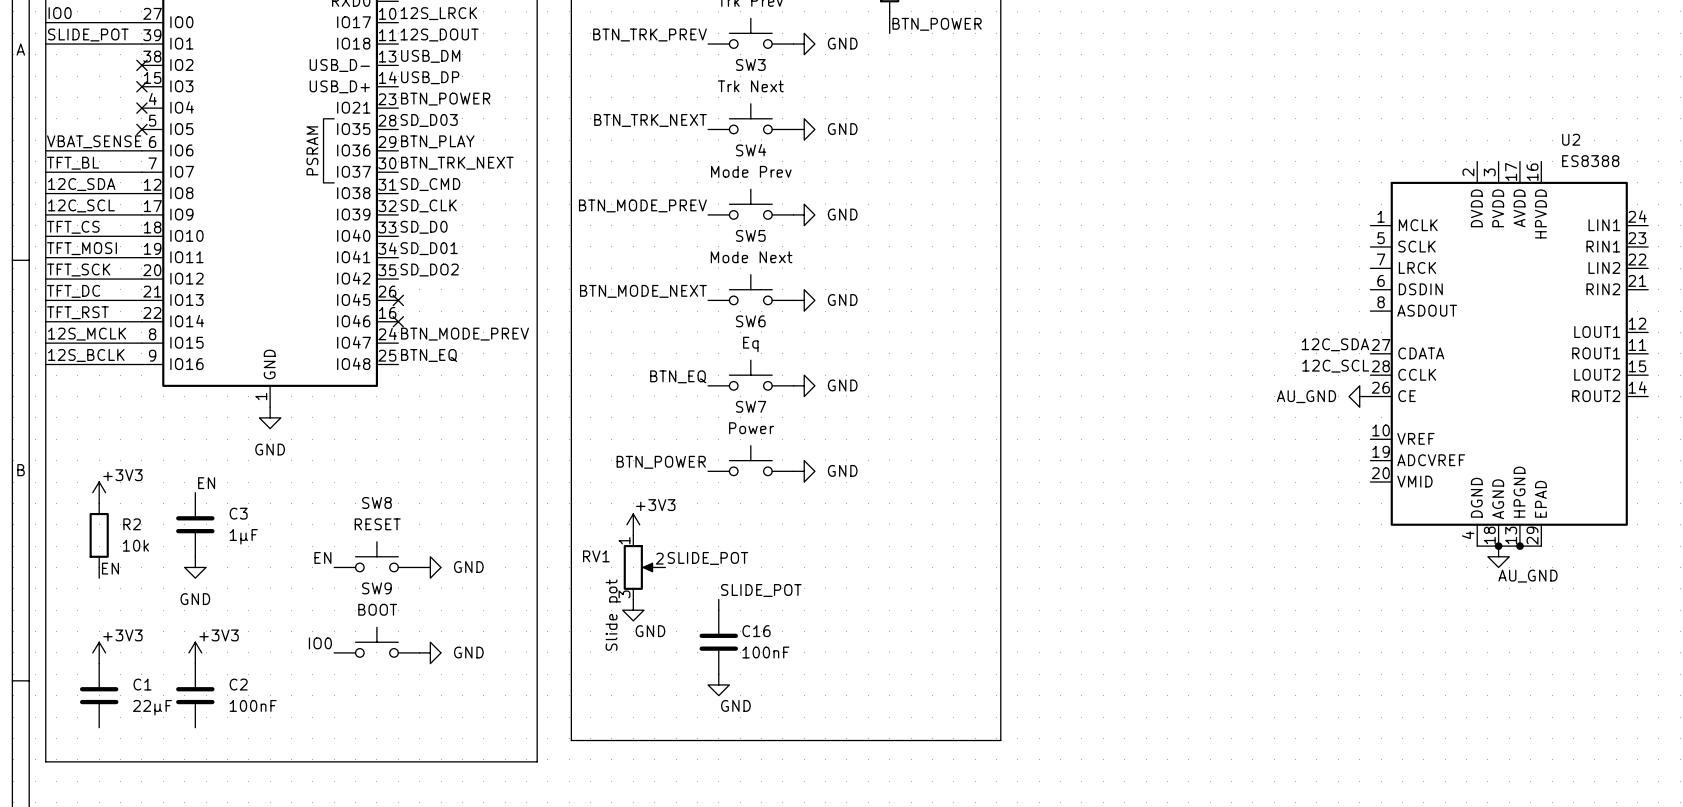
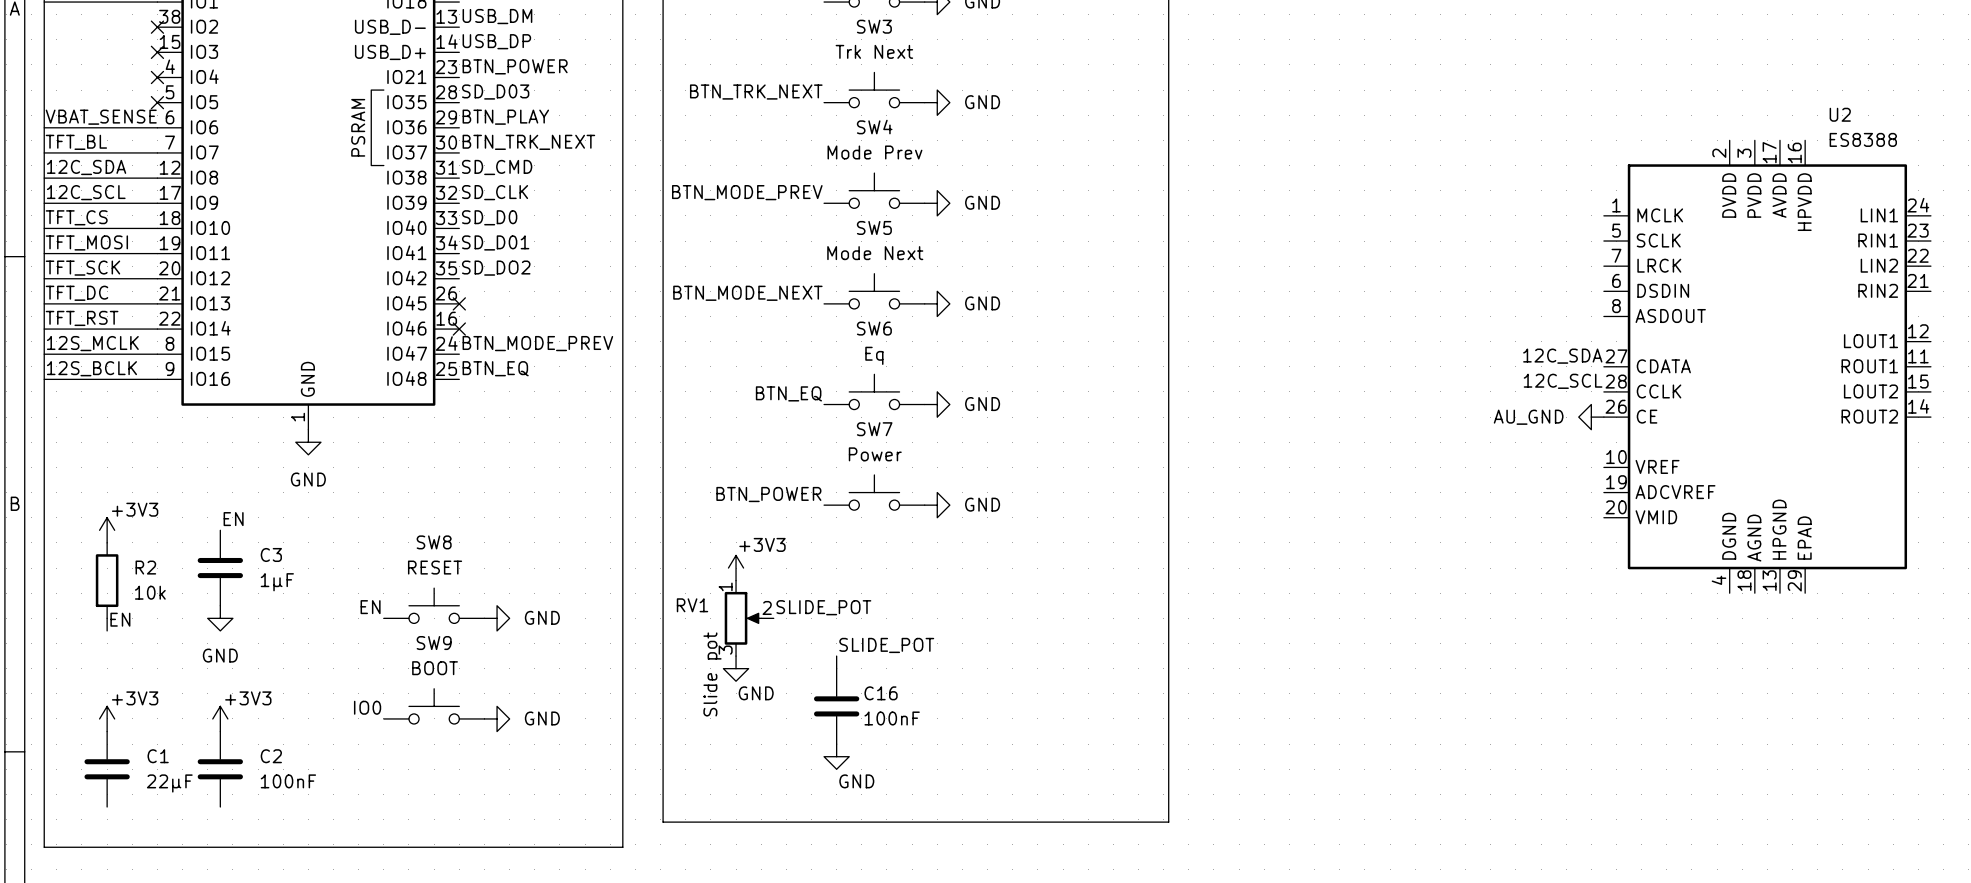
wire: (1477, 546) (1541, 546) -> none
junction: (1498, 546) -> none
junction: (1519, 546) -> none
power symbol: AU_GND (1498, 556) -> none

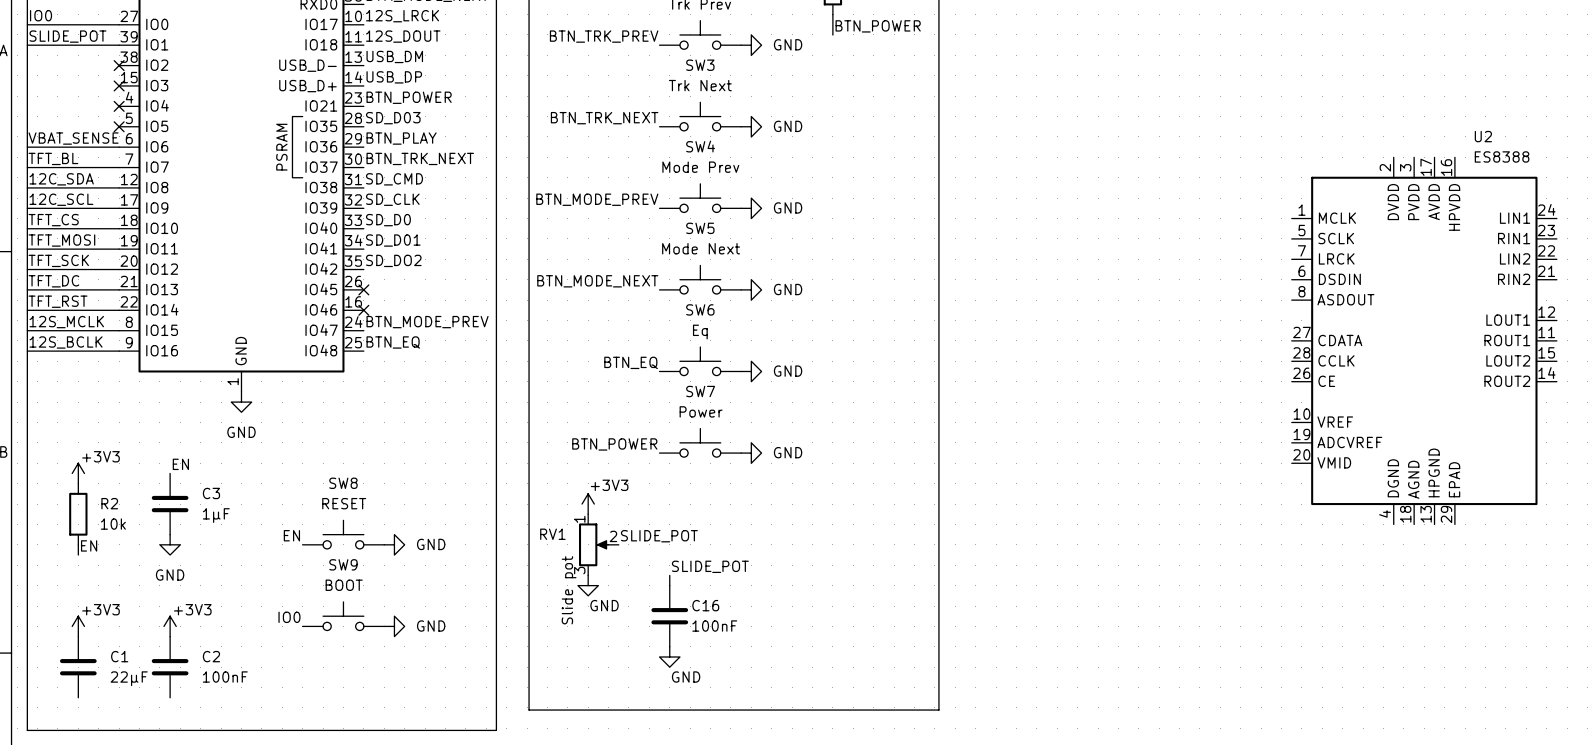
label: 12C_SDA (1562, 356) -> none
label: 12C_SCL (1563, 381) -> none
power symbol: AU_GND (1591, 417) -> none

